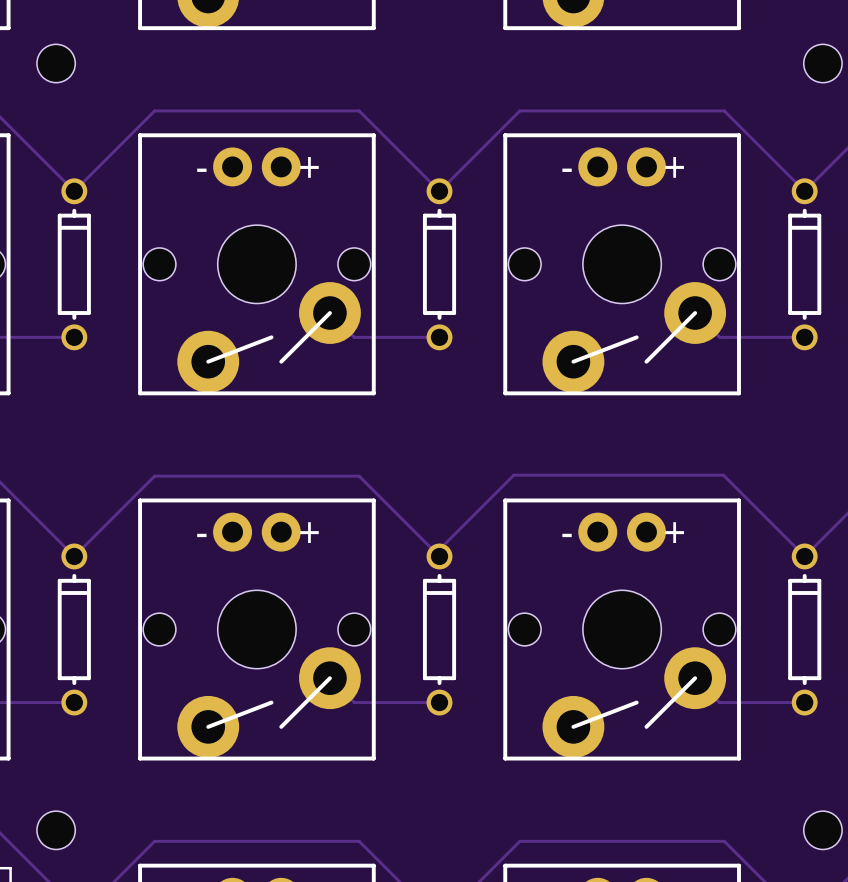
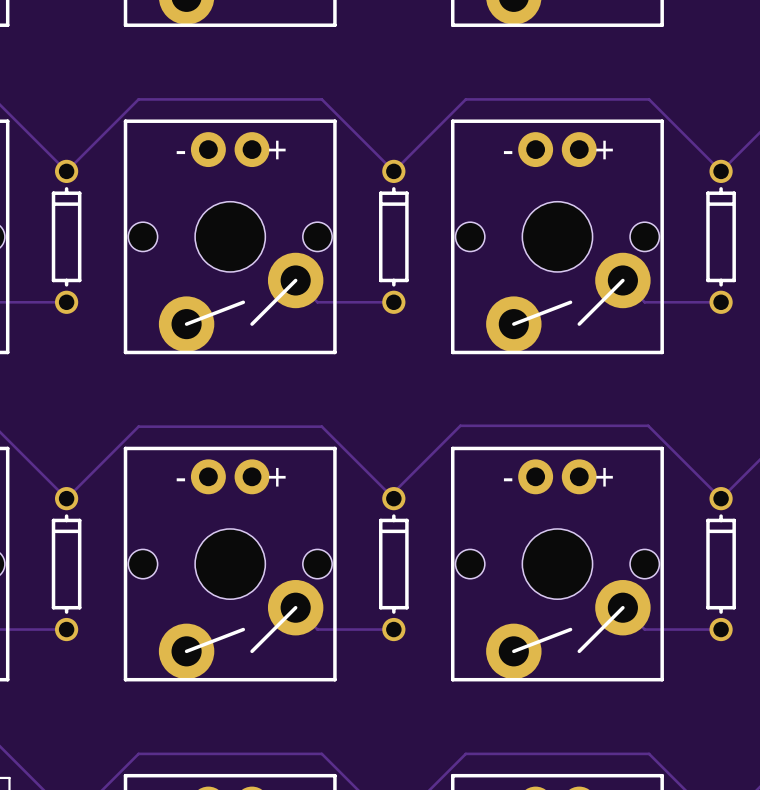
hole: (56, 63) -> none
hole: (822, 63) -> none
hole: (56, 830) -> none
hole: (822, 830) -> none

